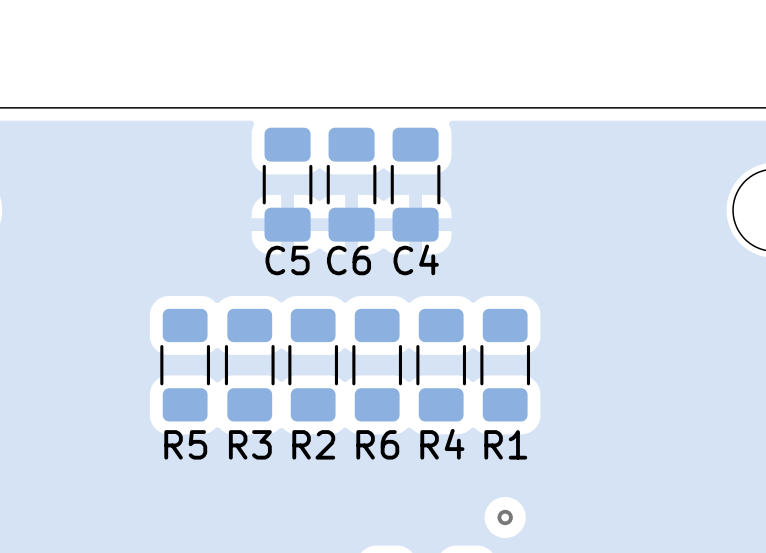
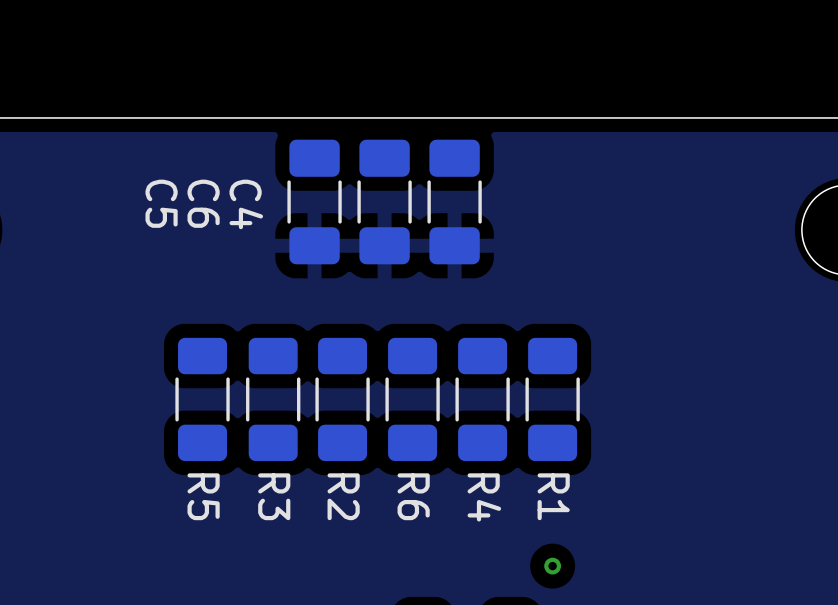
C4 name rotation: 0° (416, 259) -> 90° clockwise (246, 204)
C4 name position: C4 (416, 259) -> C4 (246, 204)
C5 name rotation: 0° (287, 260) -> 90° clockwise (161, 203)
C5 name position: C5 (287, 260) -> C5 (161, 203)
C6 name rotation: 0° (349, 260) -> 90° clockwise (203, 203)
C6 name position: C6 (349, 260) -> C6 (203, 203)
R5 name rotation: 0° (185, 444) -> 90° clockwise (203, 496)
R3 name rotation: 0° (250, 444) -> 90° clockwise (274, 496)
R2 name rotation: 0° (313, 444) -> 90° clockwise (343, 496)
R6 name rotation: 0° (377, 444) -> 90° clockwise (413, 496)
R4 name rotation: 0° (442, 444) -> 90° clockwise (484, 497)
R1 name rotation: 0° (505, 444) -> 90° clockwise (553, 496)

